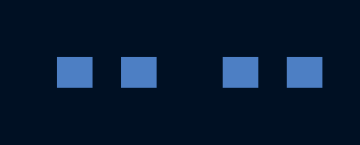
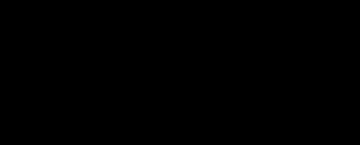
part: (106, 72) -> none
part: (272, 72) -> none

